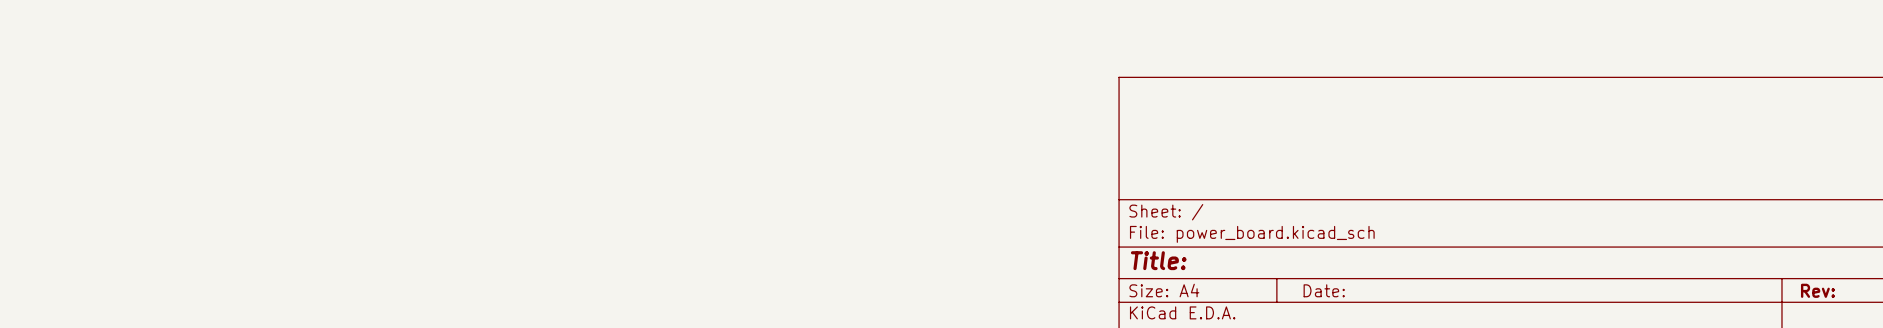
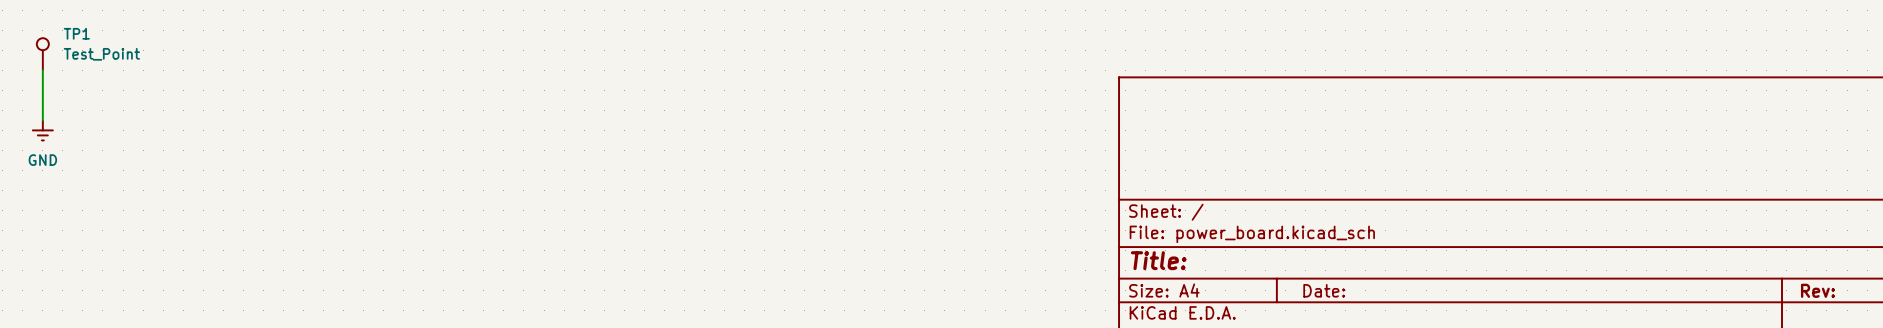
TP1: none -> Test_Point (42, 54)
wire: none -> (42, 70) (42, 120)
power symbol: none -> GND (42, 130)

